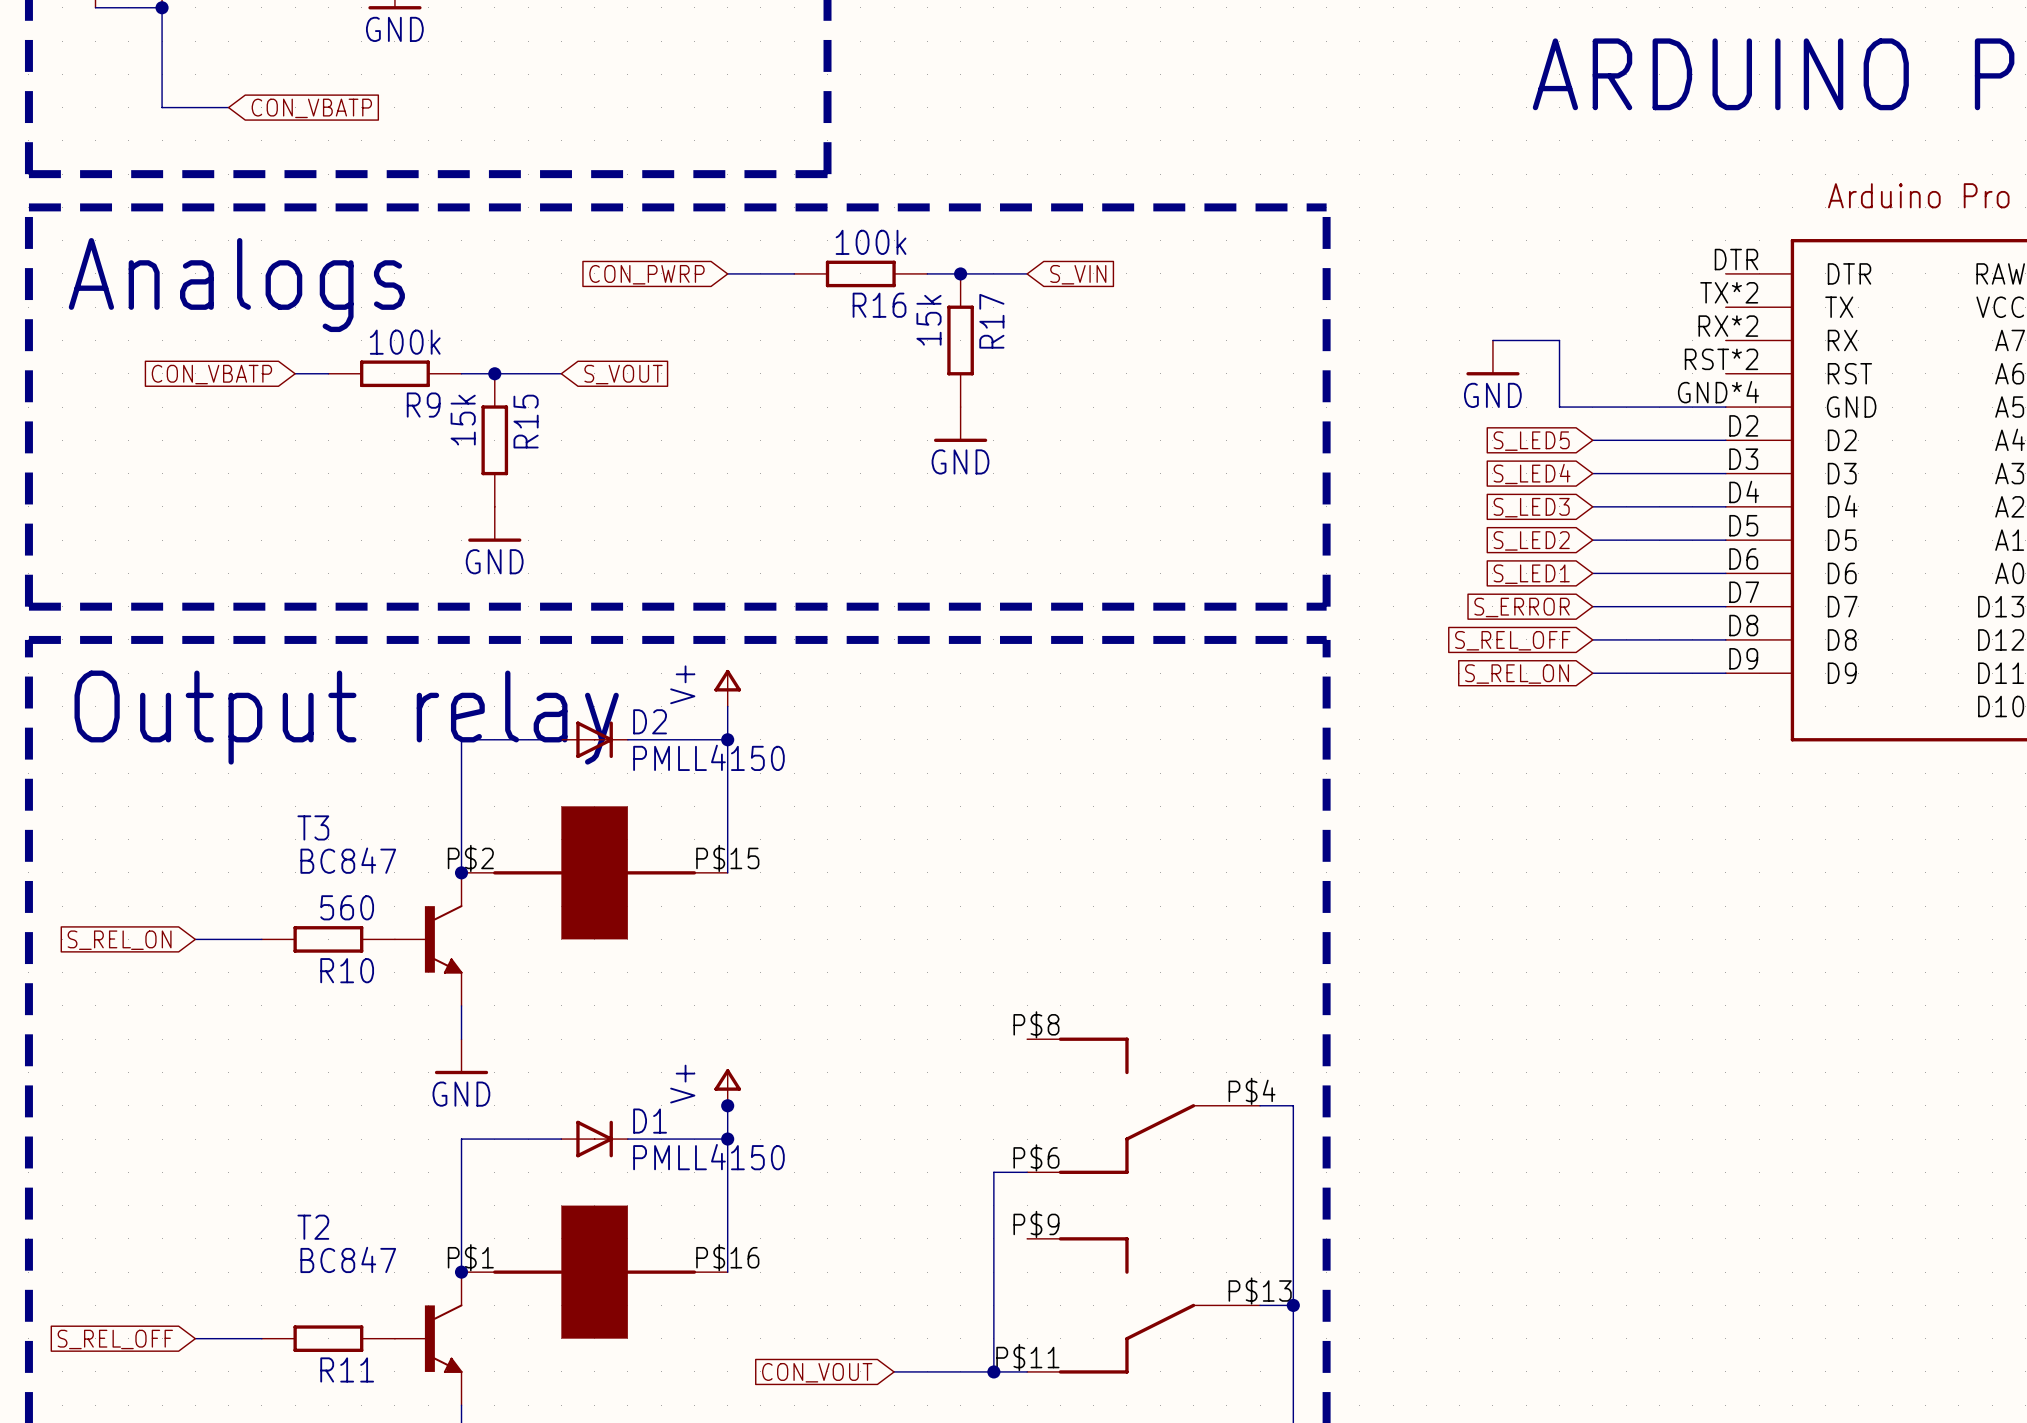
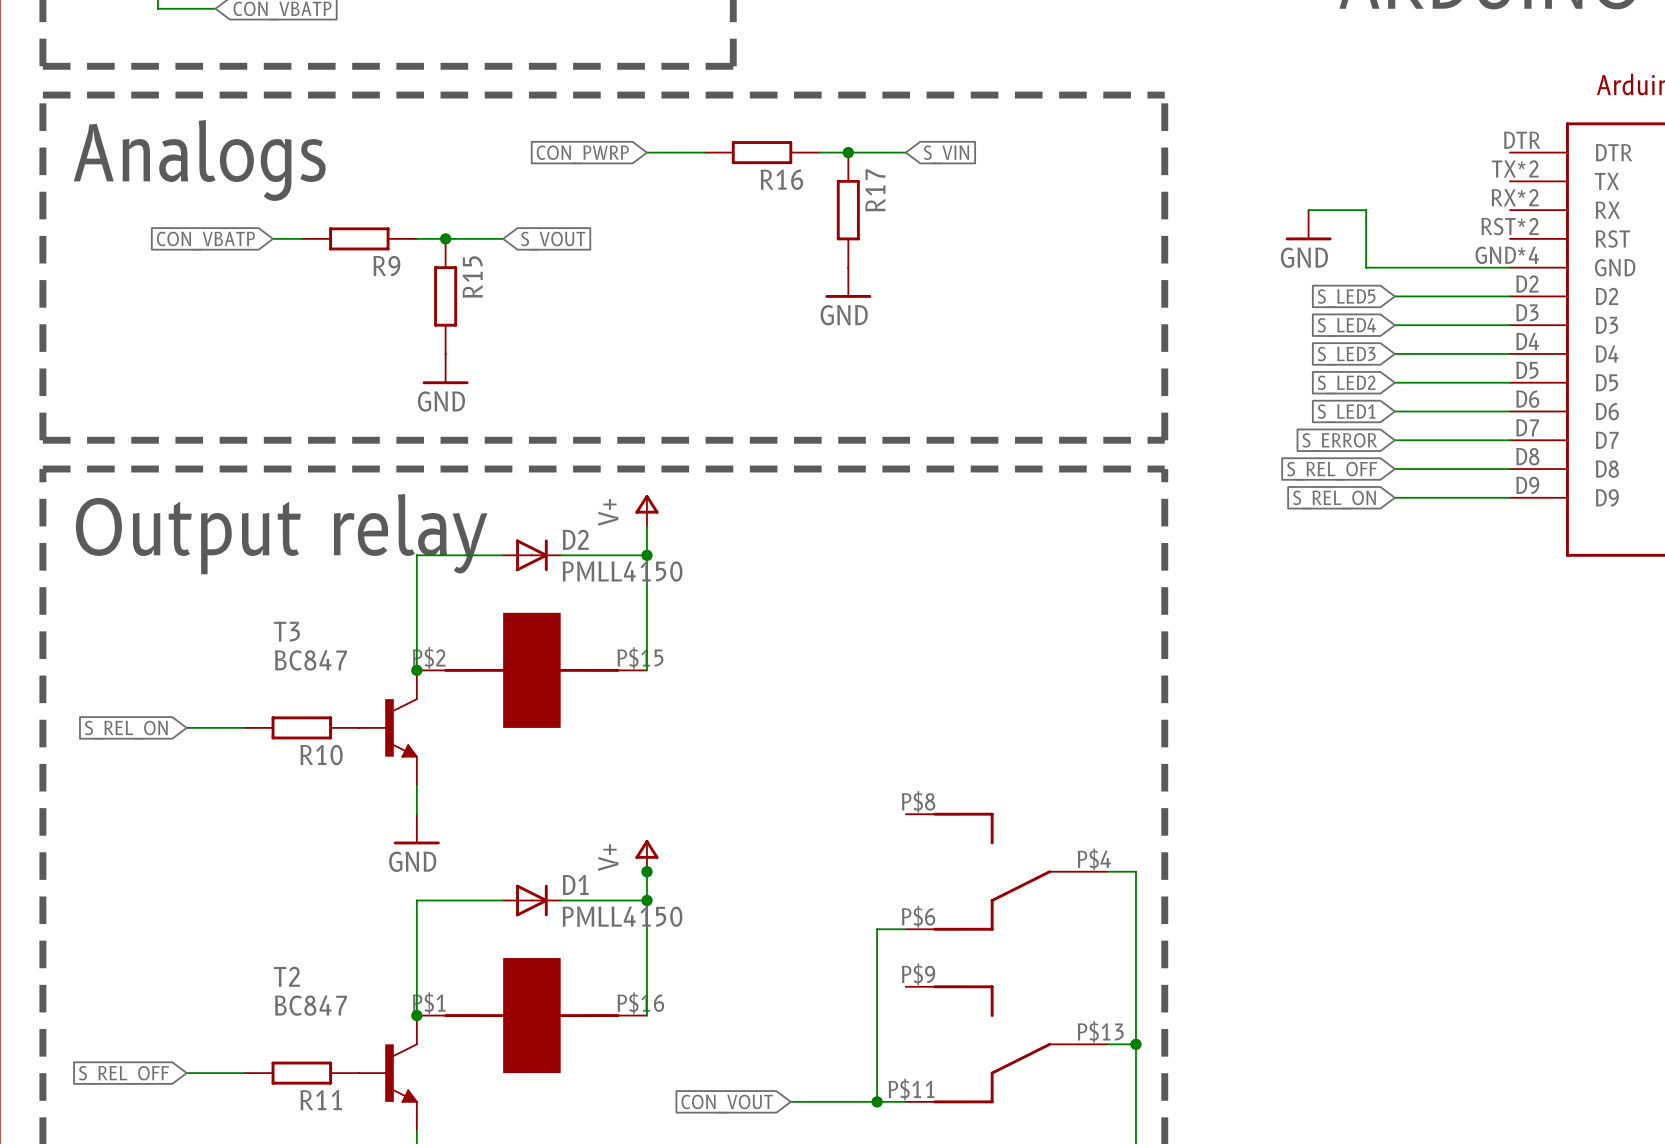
R16 value: 100k (871, 242) -> none
R17 value: 15k (928, 320) -> none
R9 value: 100k (405, 342) -> none
R15 value: 15k (463, 420) -> none
R10 value: 560 (347, 907) -> none

